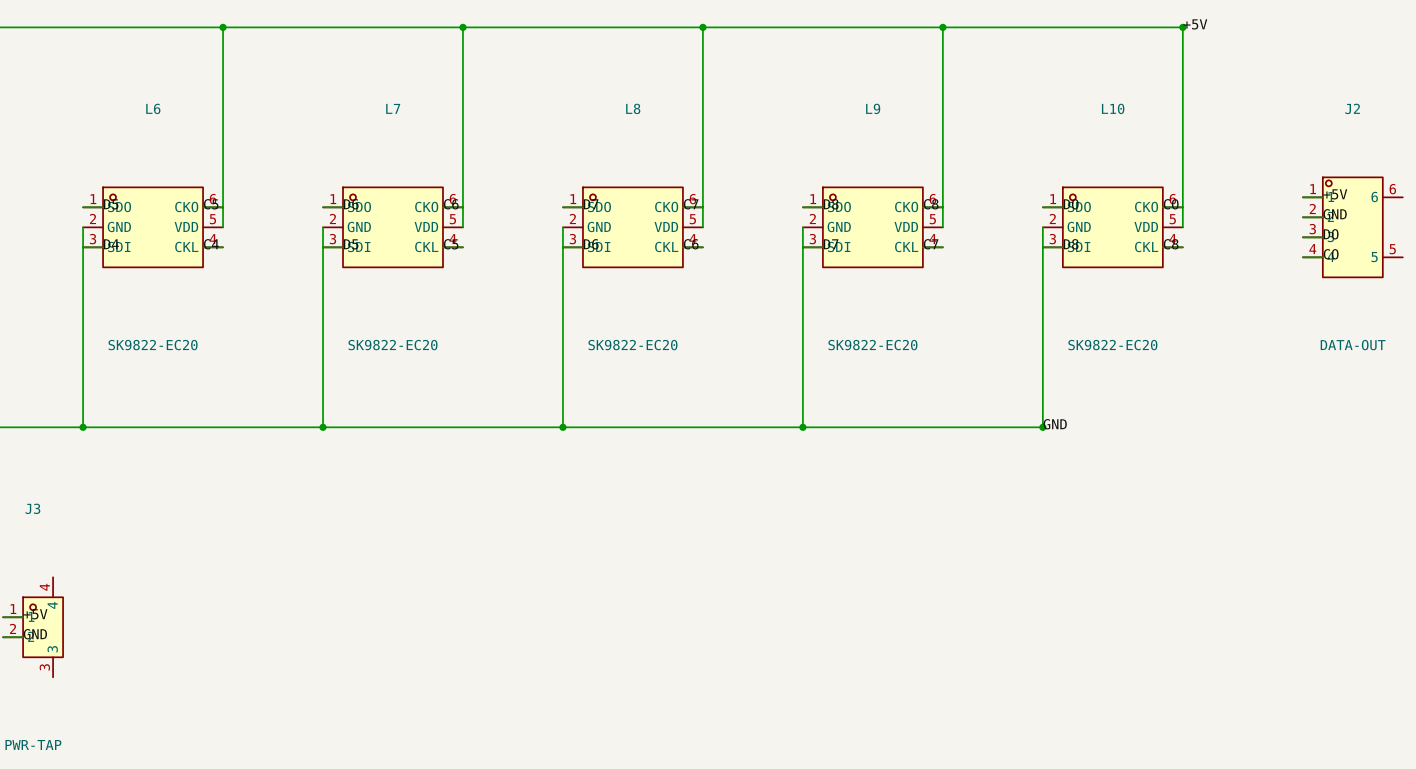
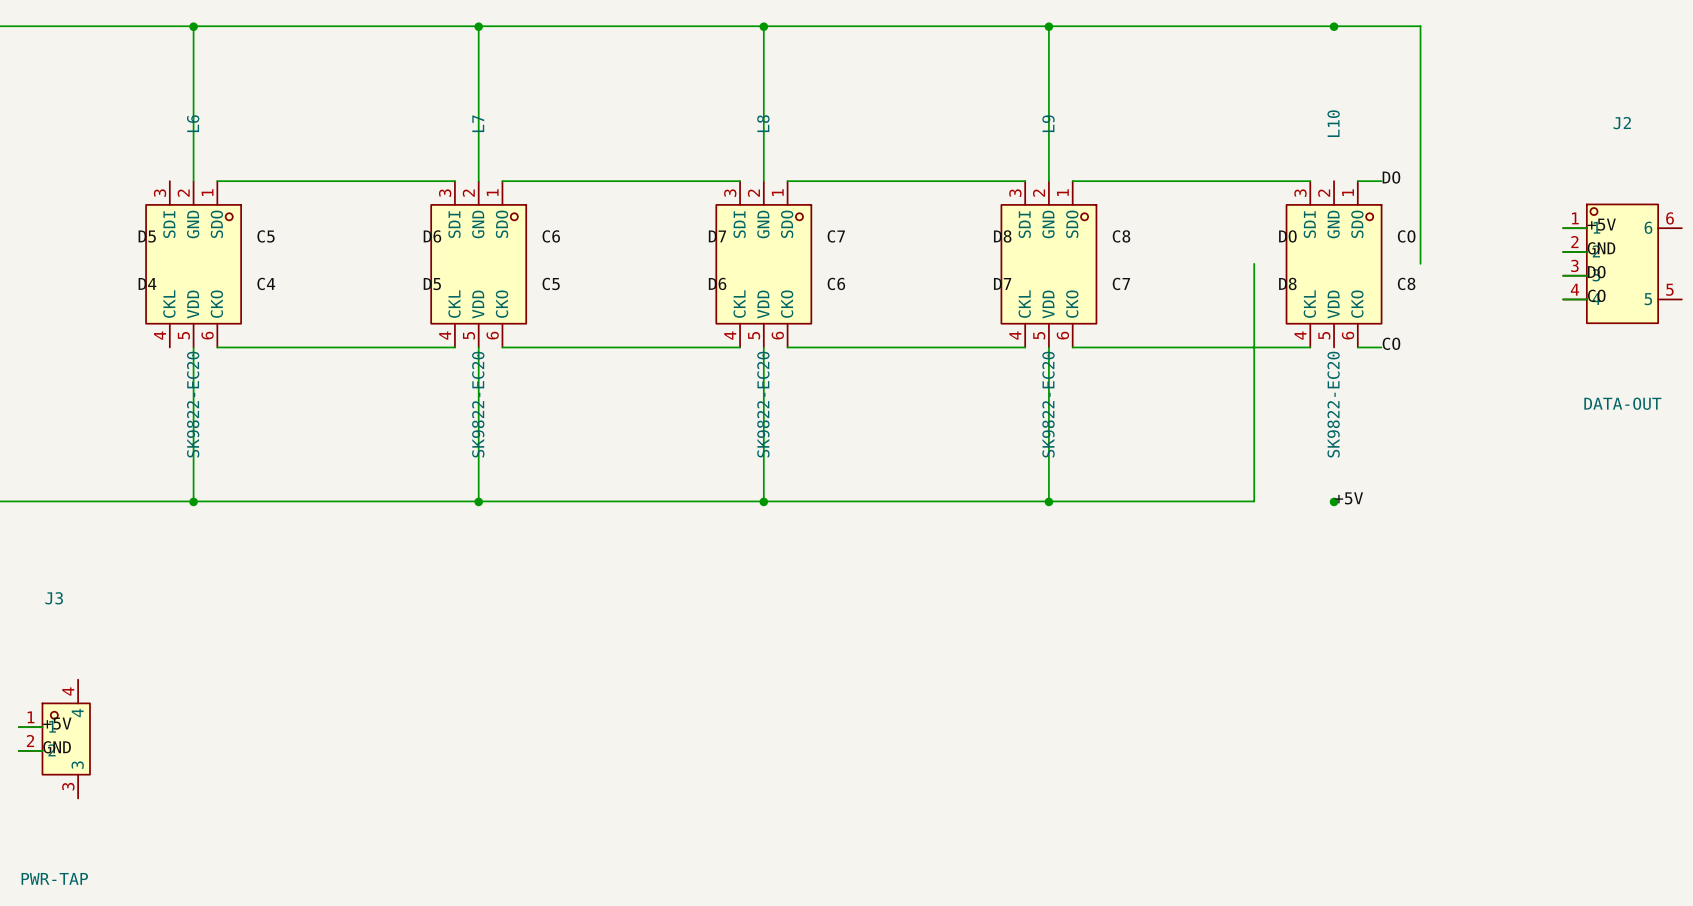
label: +5V (1195, 24) -> none
wire: none -> (193, 26) (193, 181)
junction: none -> (193, 26)
wire: (223, 27) (223, 227) -> none
junction: (223, 27) -> none
wire: none -> (478, 26) (478, 181)
junction: none -> (478, 26)
wire: (462, 27) (462, 227) -> none
junction: (462, 27) -> none
wire: none -> (763, 26) (763, 181)
junction: none -> (763, 26)
wire: (702, 27) (702, 227) -> none
junction: (702, 27) -> none
wire: none -> (1048, 26) (1048, 181)
junction: none -> (1048, 26)
wire: (942, 27) (942, 227) -> none
junction: (942, 27) -> none
junction: none -> (1334, 26)
junction: (1182, 27) -> none
label: none -> DO (1391, 177)
wire: none -> (217, 181) (454, 181)
wire: none -> (502, 181) (740, 181)
wire: none -> (787, 181) (1025, 181)
wire: none -> (1072, 181) (1310, 181)
wire: (83, 207) (103, 207) -> none
wire: (203, 207) (223, 207) -> none
wire: (323, 207) (343, 207) -> none
wire: (442, 207) (462, 207) -> none
wire: (562, 207) (582, 207) -> none
wire: (682, 207) (702, 207) -> none
wire: (802, 207) (822, 207) -> none
wire: (922, 207) (942, 207) -> none
wire: (1042, 207) (1062, 207) -> none
wire: (1162, 207) (1182, 207) -> (1357, 181) (1381, 181)
wire: (83, 227) (83, 427) -> none
L6 rotation: 0° (153, 227) -> 90° clockwise (193, 264)
wire: (323, 227) (323, 427) -> none
L7 rotation: 0° (393, 227) -> 90° clockwise (478, 264)
wire: (562, 227) (562, 427) -> none
L8 rotation: 0° (632, 227) -> 90° clockwise (763, 264)
wire: (802, 227) (802, 427) -> none
L9 rotation: 0° (872, 227) -> 90° clockwise (1048, 264)
L10 rotation: 0° (1112, 227) -> 90° clockwise (1334, 264)
wire: (83, 247) (103, 247) -> none
wire: (203, 247) (223, 247) -> none
wire: (323, 247) (343, 247) -> none
wire: (442, 247) (462, 247) -> none
wire: (562, 247) (582, 247) -> none
wire: (682, 247) (702, 247) -> none
wire: (802, 247) (822, 247) -> none
wire: (922, 247) (942, 247) -> none
wire: (1042, 247) (1062, 247) -> none
wire: (1162, 247) (1182, 247) -> (1357, 347) (1381, 347)
label: none -> CO (1391, 343)
wire: none -> (193, 347) (193, 501)
wire: none -> (217, 347) (454, 347)
wire: none -> (478, 347) (478, 501)
wire: none -> (502, 347) (740, 347)
wire: none -> (763, 347) (763, 501)
wire: none -> (787, 347) (1025, 347)
wire: none -> (1048, 347) (1048, 501)
wire: none -> (1072, 347) (1310, 347)
label: GND (1055, 424) -> none
label: none -> +5V (1348, 498)
junction: (83, 427) -> none
junction: none -> (193, 501)
junction: (323, 427) -> none
junction: none -> (478, 501)
junction: (562, 427) -> none
junction: none -> (763, 501)
junction: (802, 427) -> none
junction: none -> (1048, 501)
junction: (1042, 427) -> none
junction: none -> (1334, 501)

